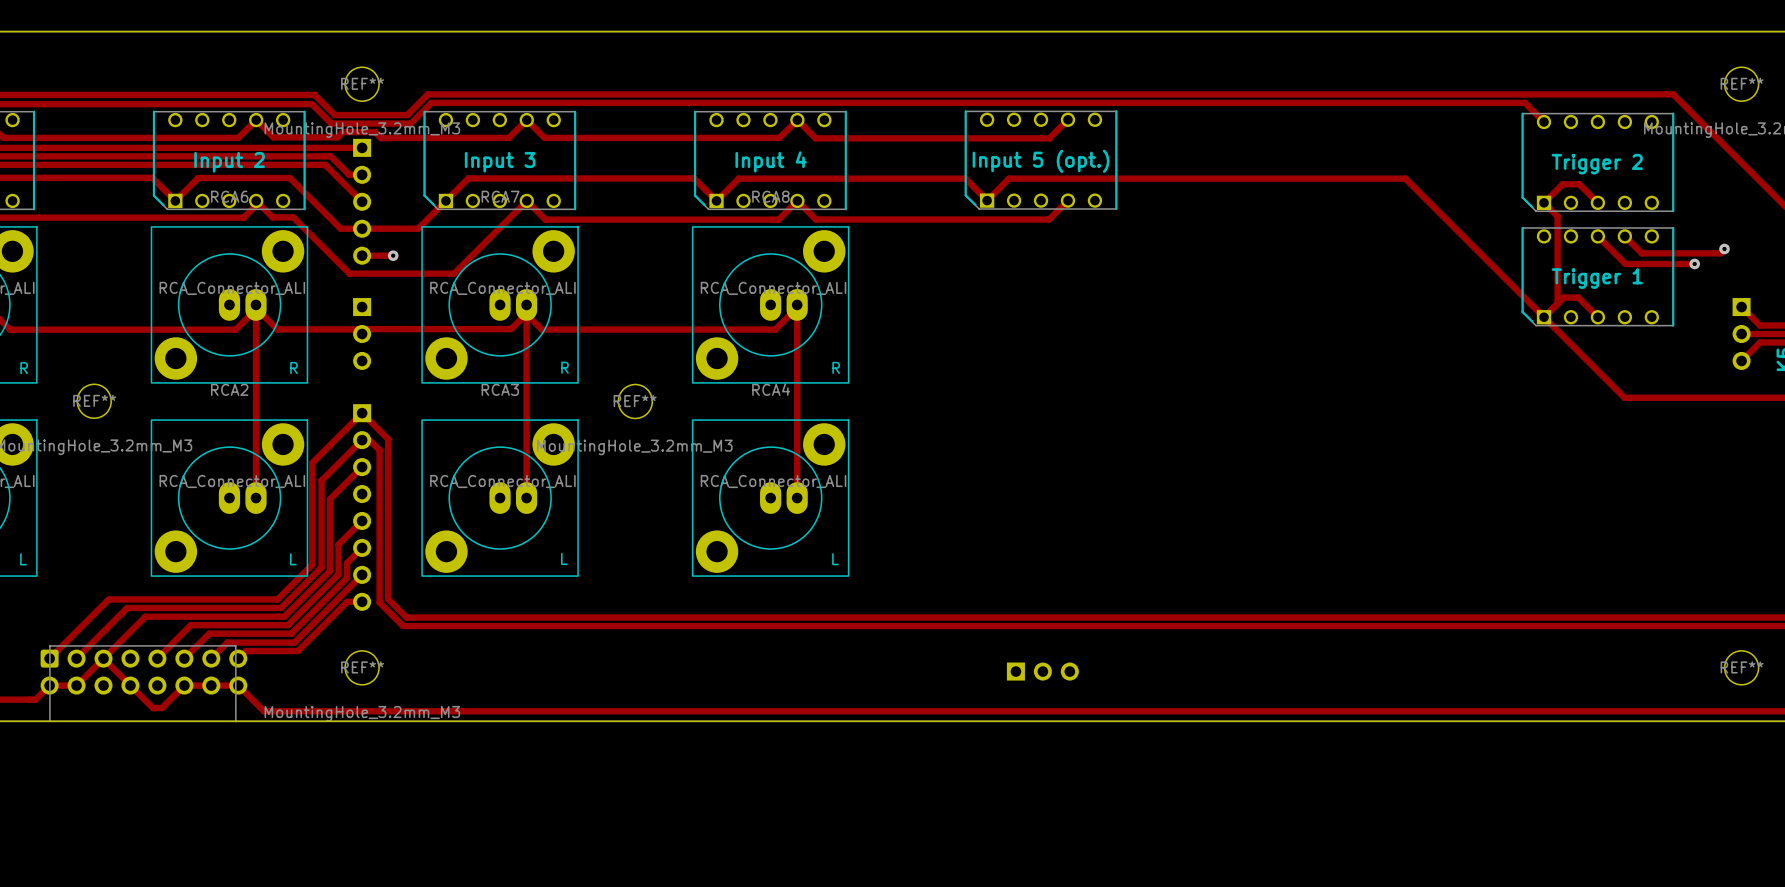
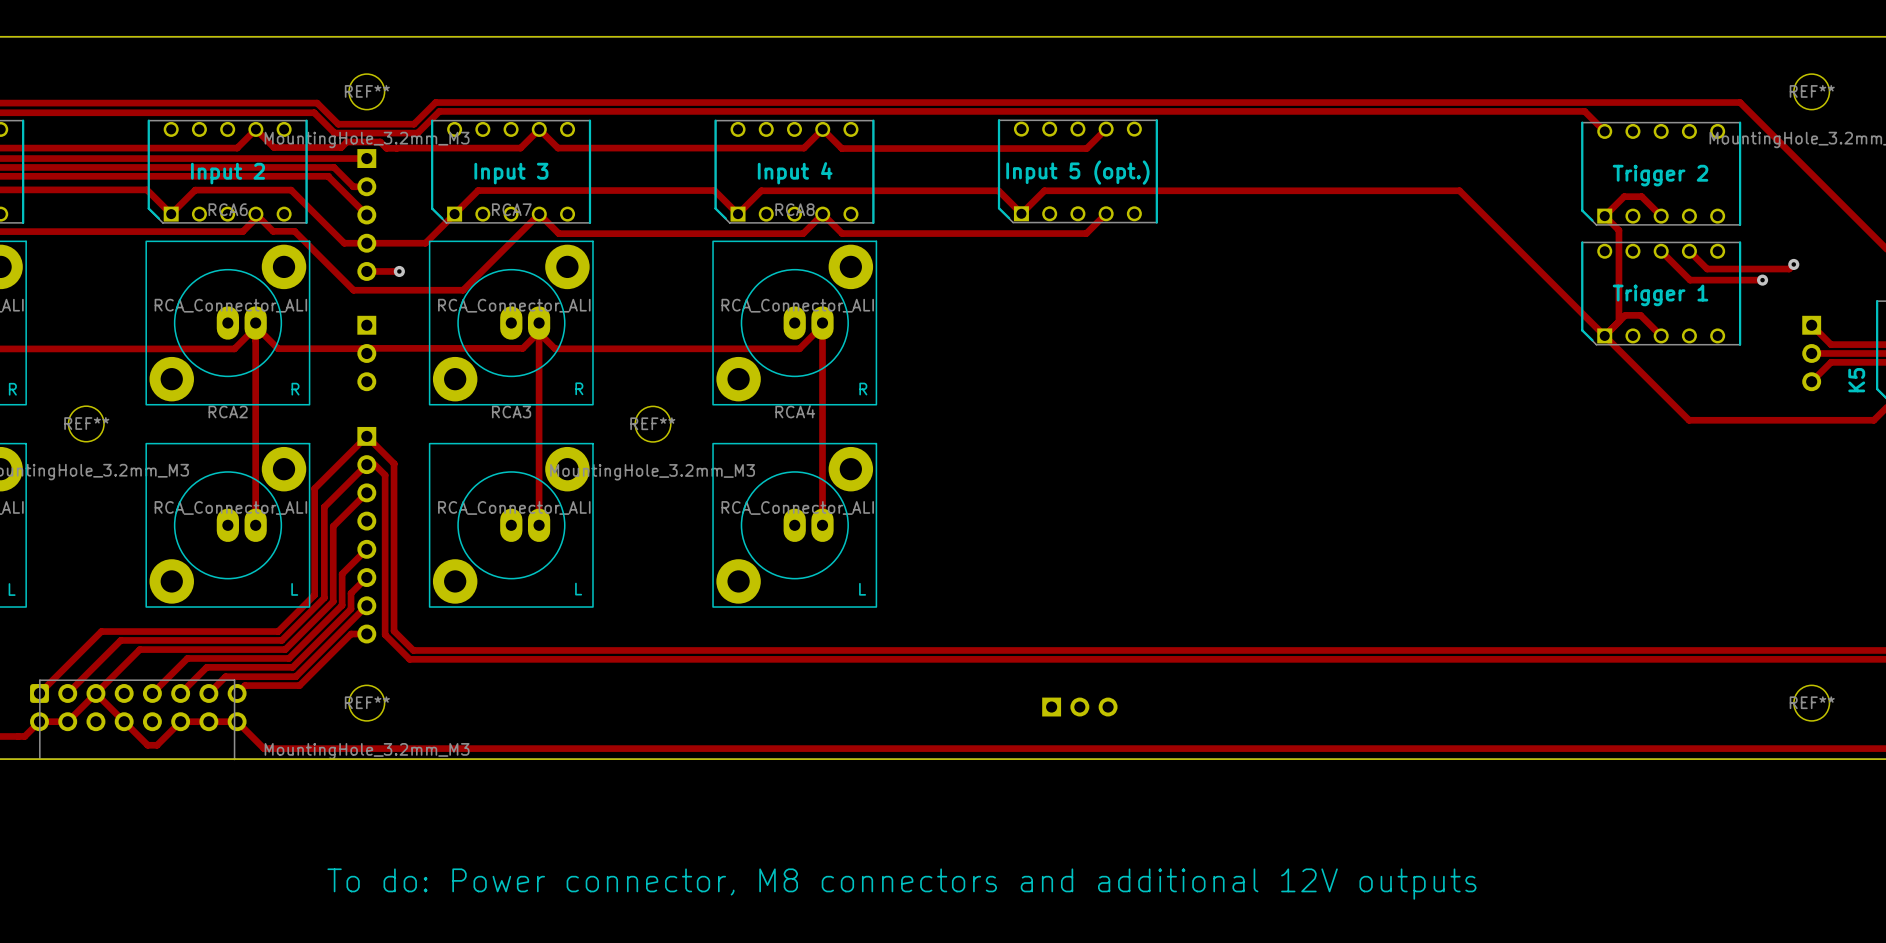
text: none -> To do: Power connector, M8 connectors and additional 12V outputs (901, 884)

